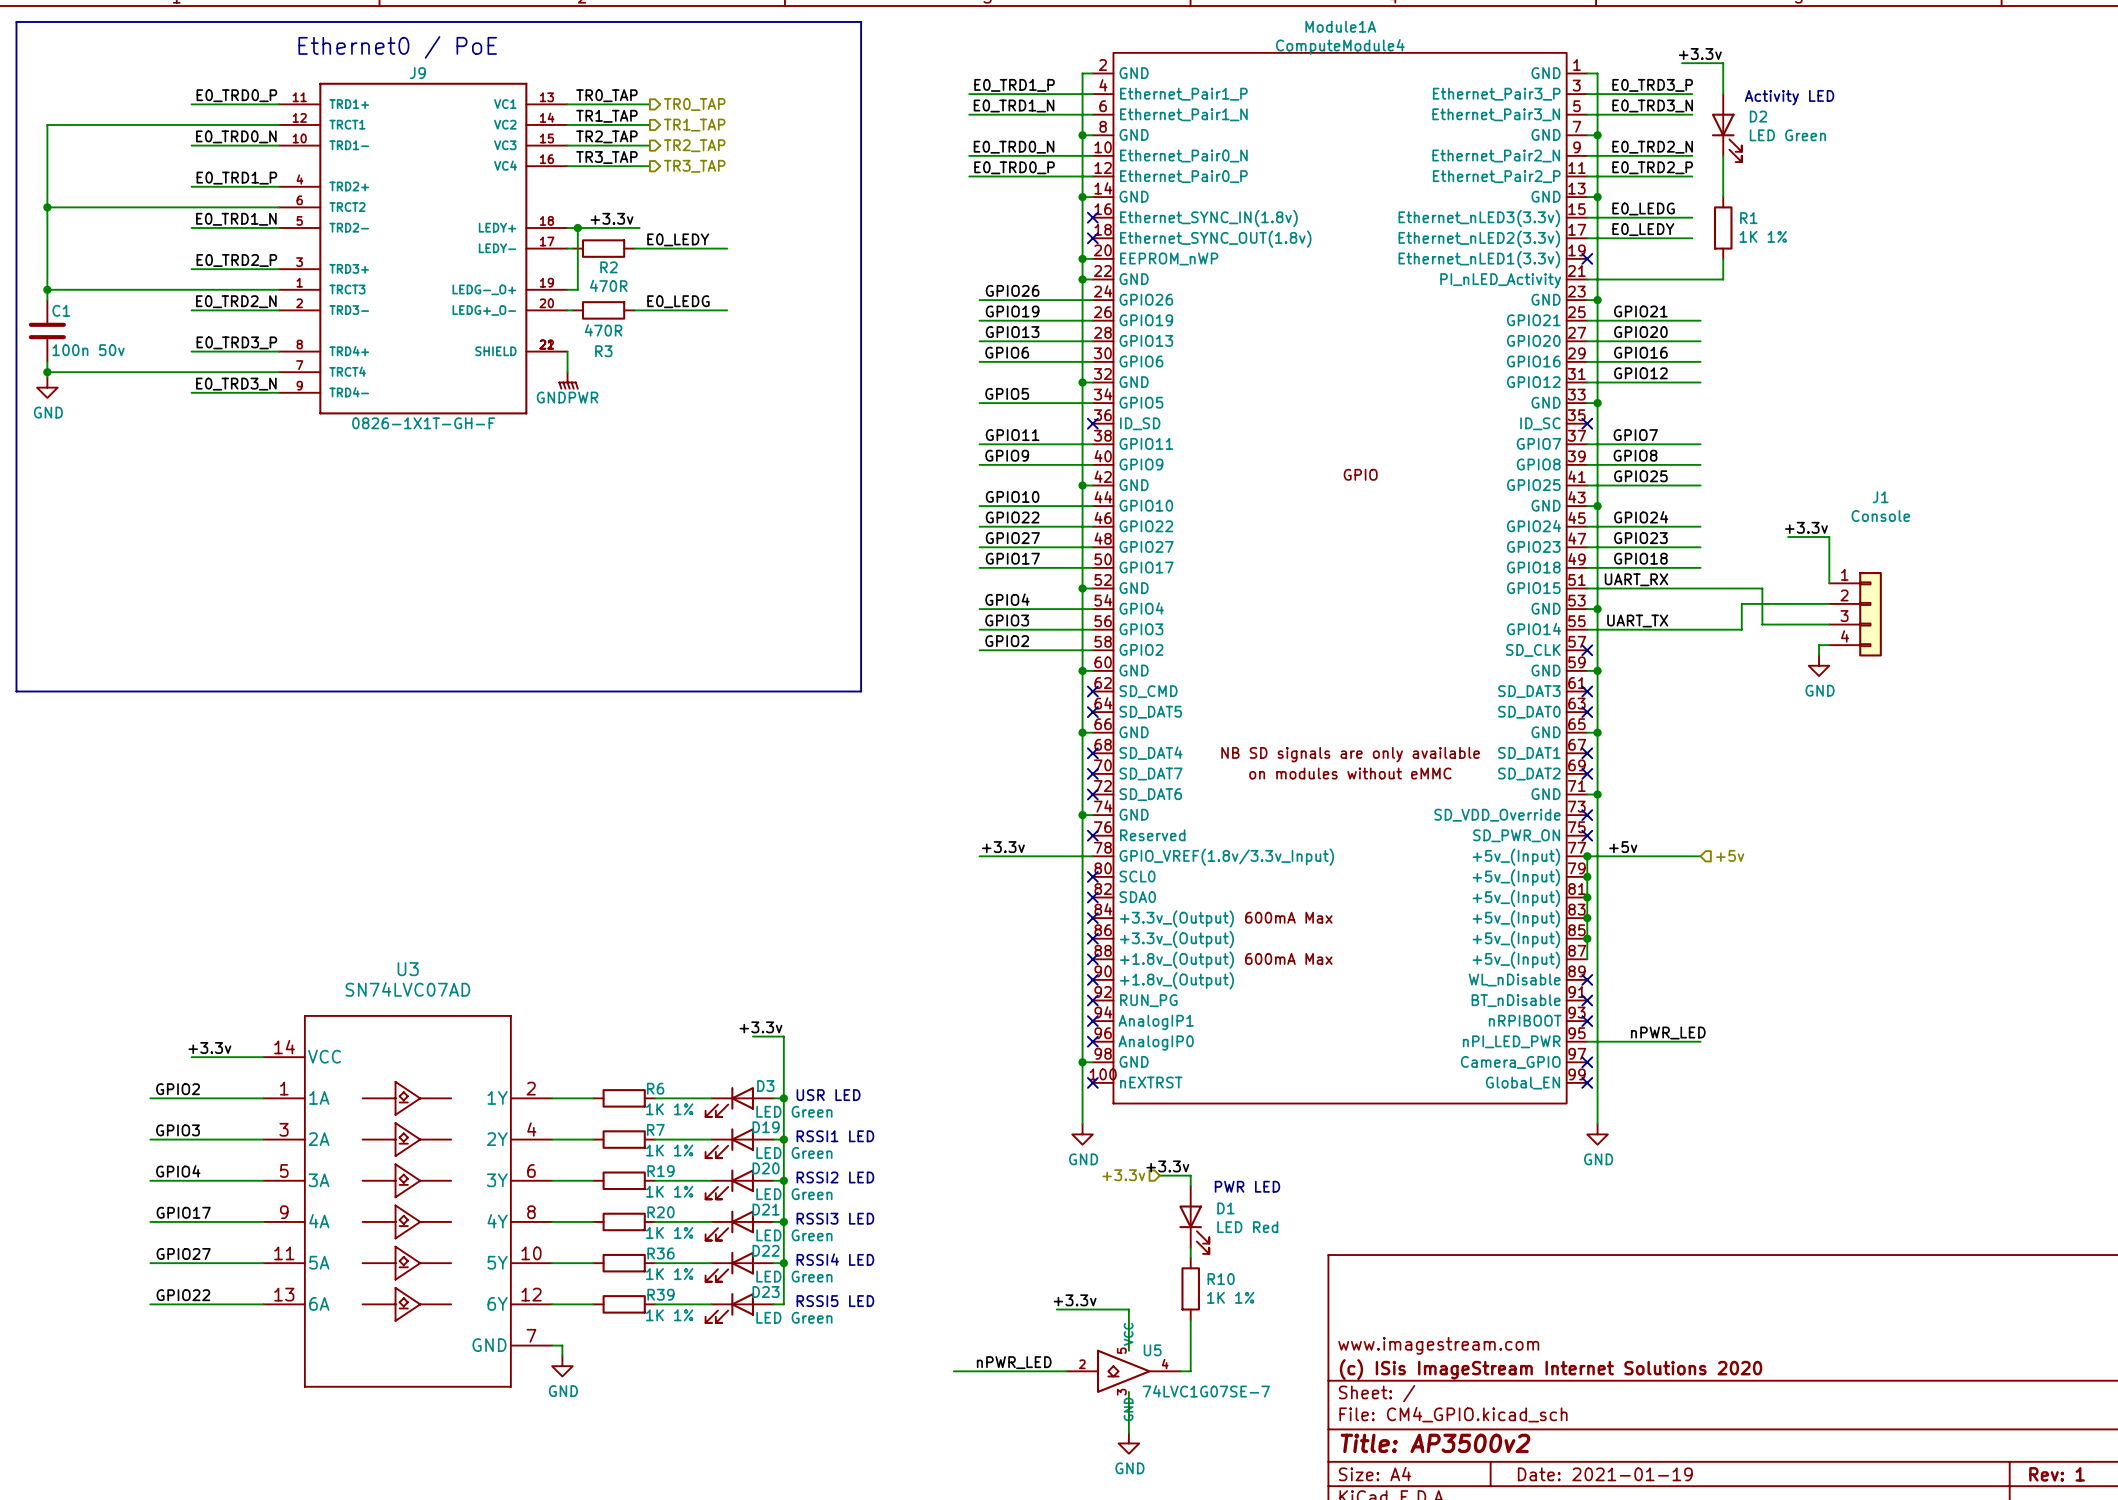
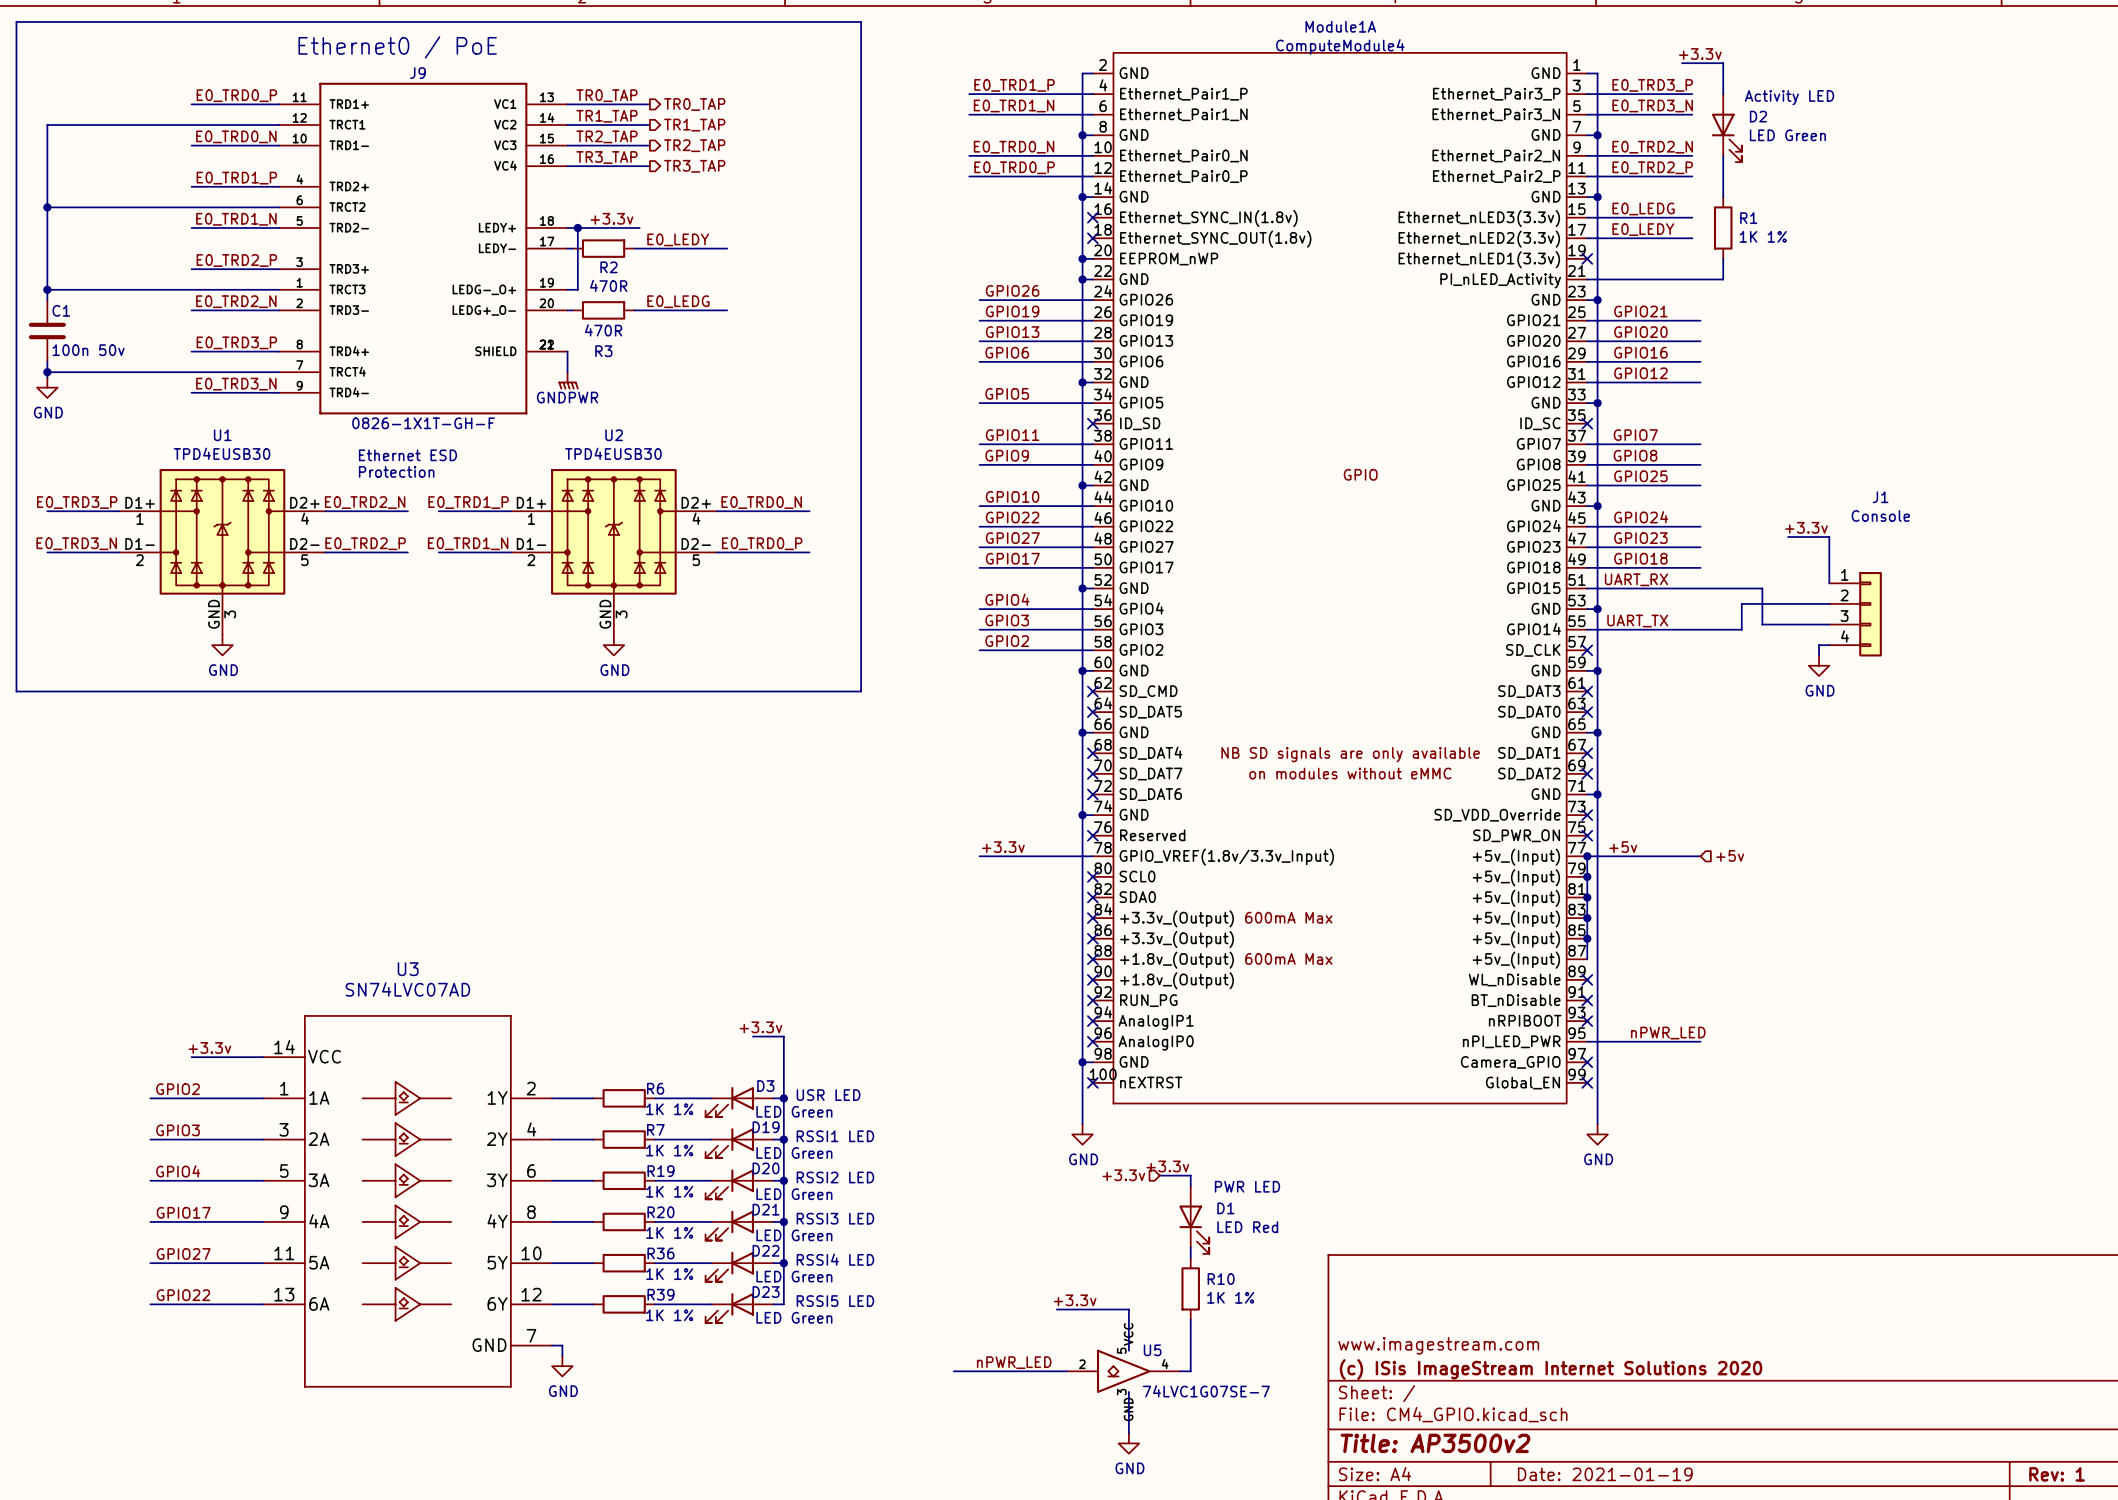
text: none -> Ethernet ESD (407, 455)
text: none -> Protection (396, 471)
label: none -> E0_TRD3_P (77, 502)
label: none -> E0_TRD2_N (365, 502)
label: none -> E0_TRD1_P (468, 502)
label: none -> E0_TRD0_N (761, 502)
wire: none -> (47, 511) (119, 511)
wire: none -> (325, 511) (407, 511)
wire: none -> (438, 511) (510, 511)
wire: none -> (716, 511) (809, 511)
label: none -> E0_TRD3_N (76, 543)
label: none -> E0_TRD2_P (365, 543)
label: none -> E0_TRD1_N (468, 543)
label: none -> E0_TRD0_P (762, 543)
U1: none -> TPD4EUSB30 (222, 551)
U2: none -> TPD4EUSB30 (613, 551)
wire: none -> (47, 552) (119, 552)
wire: none -> (325, 552) (407, 552)
wire: none -> (438, 552) (510, 552)
wire: none -> (716, 552) (809, 552)
power symbol: none -> GND (222, 645)
power symbol: none -> GND (613, 645)

